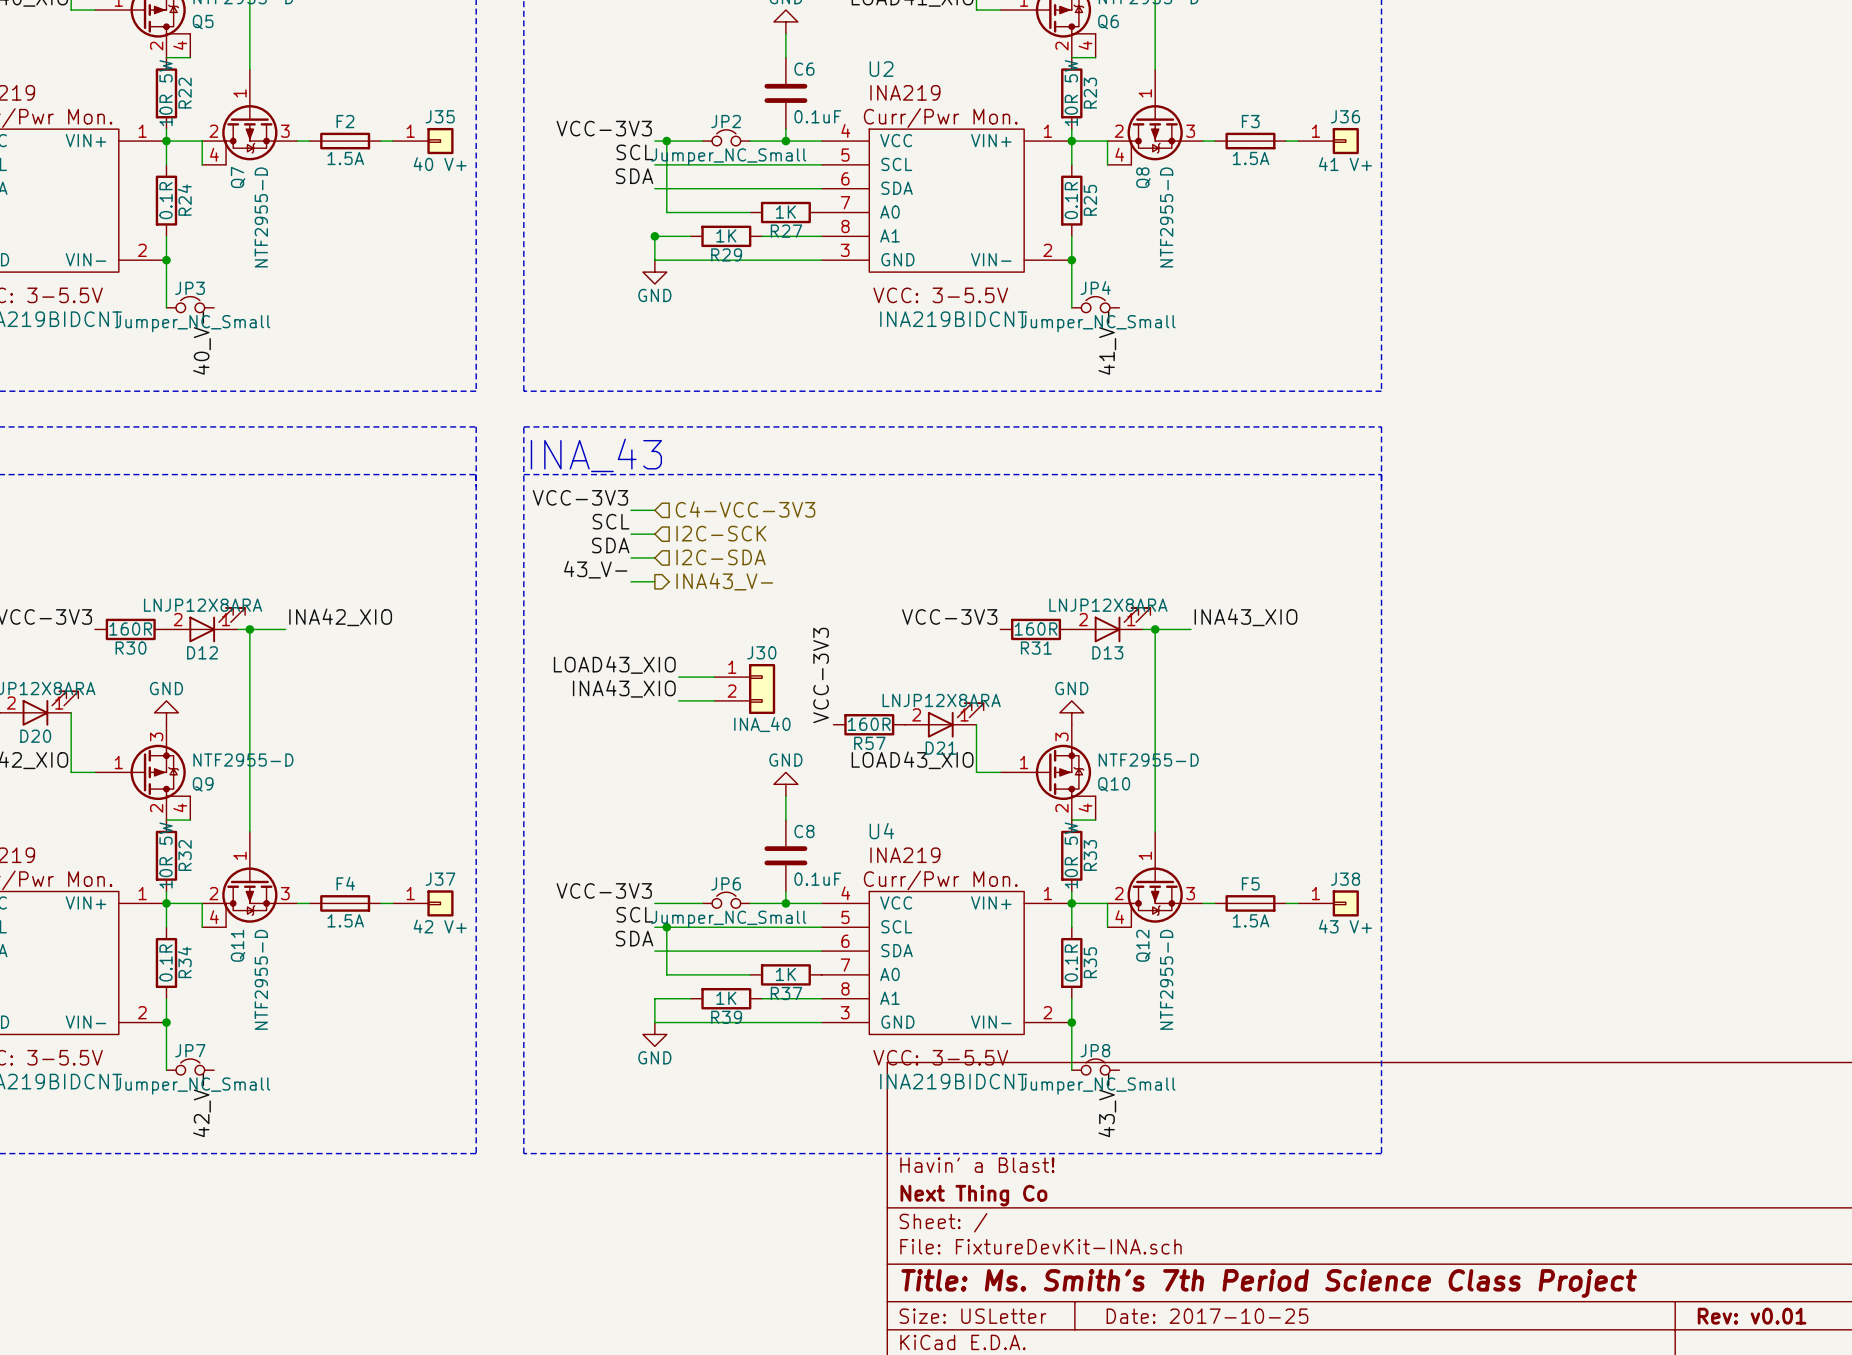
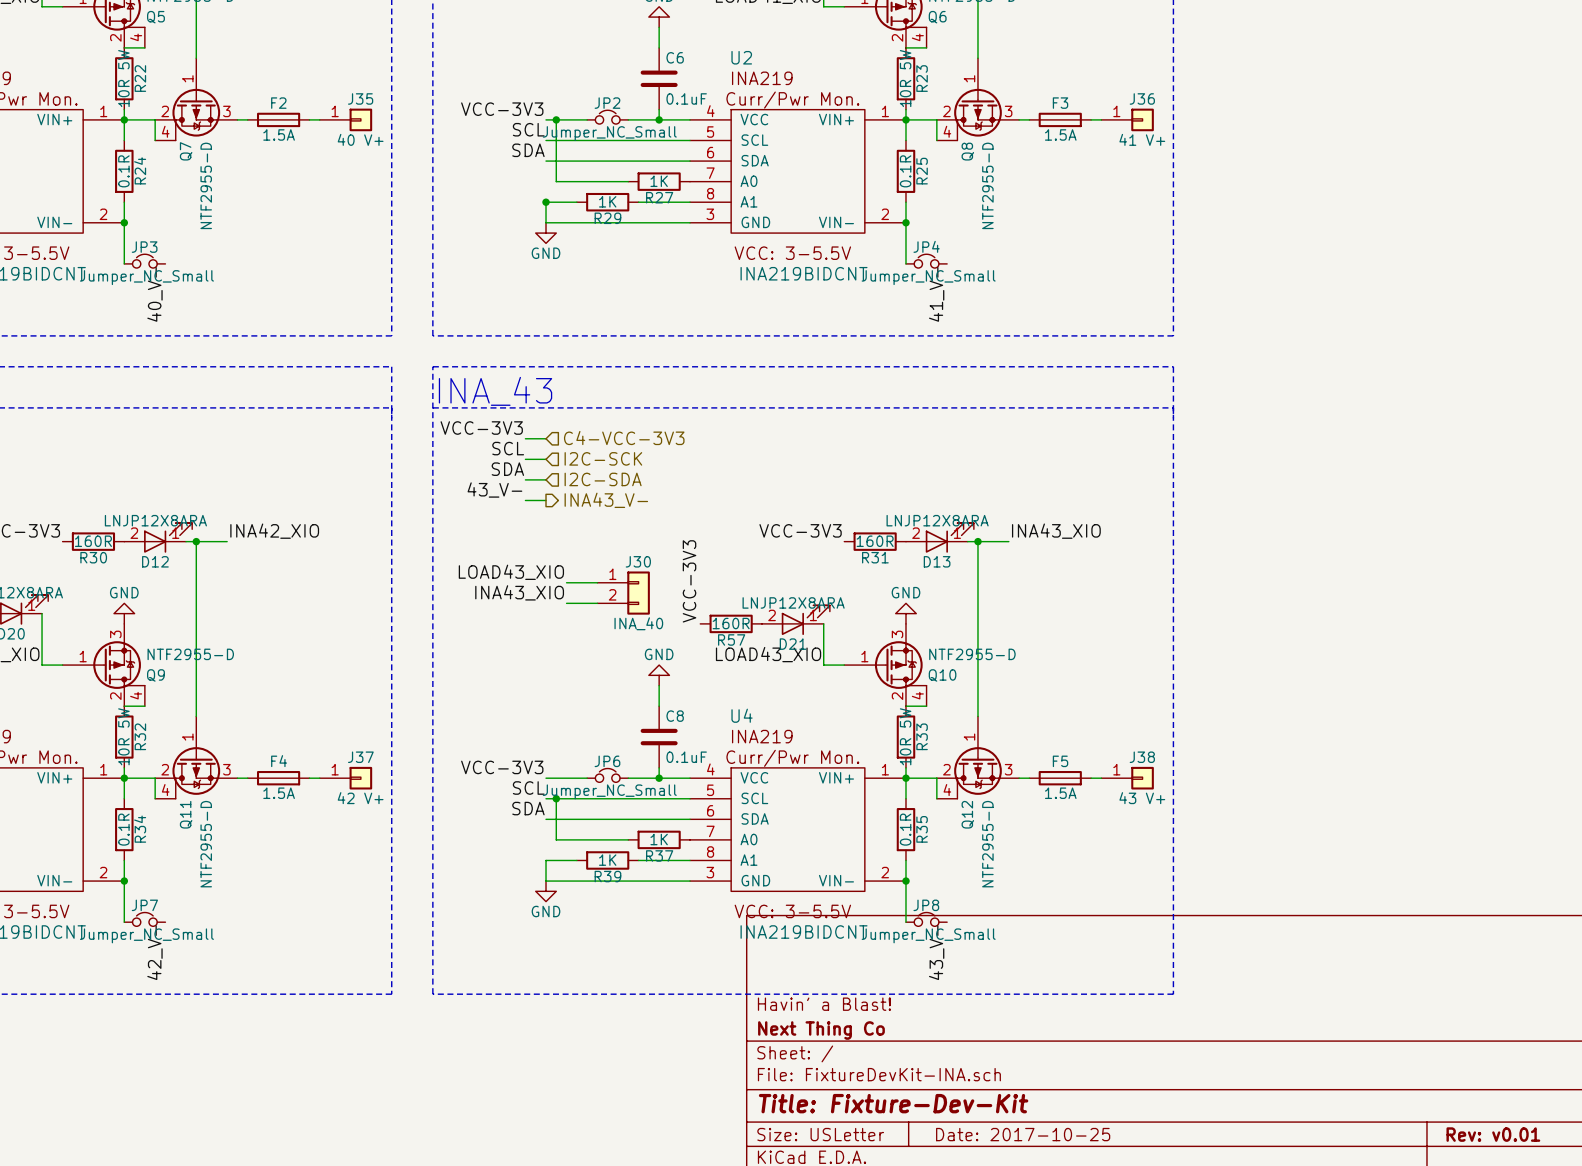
title block: Title: Ms. Smith's 7th Period Science Class Project (1269, 1283) -> Title: Fixture-Dev-Kit (893, 1103)

